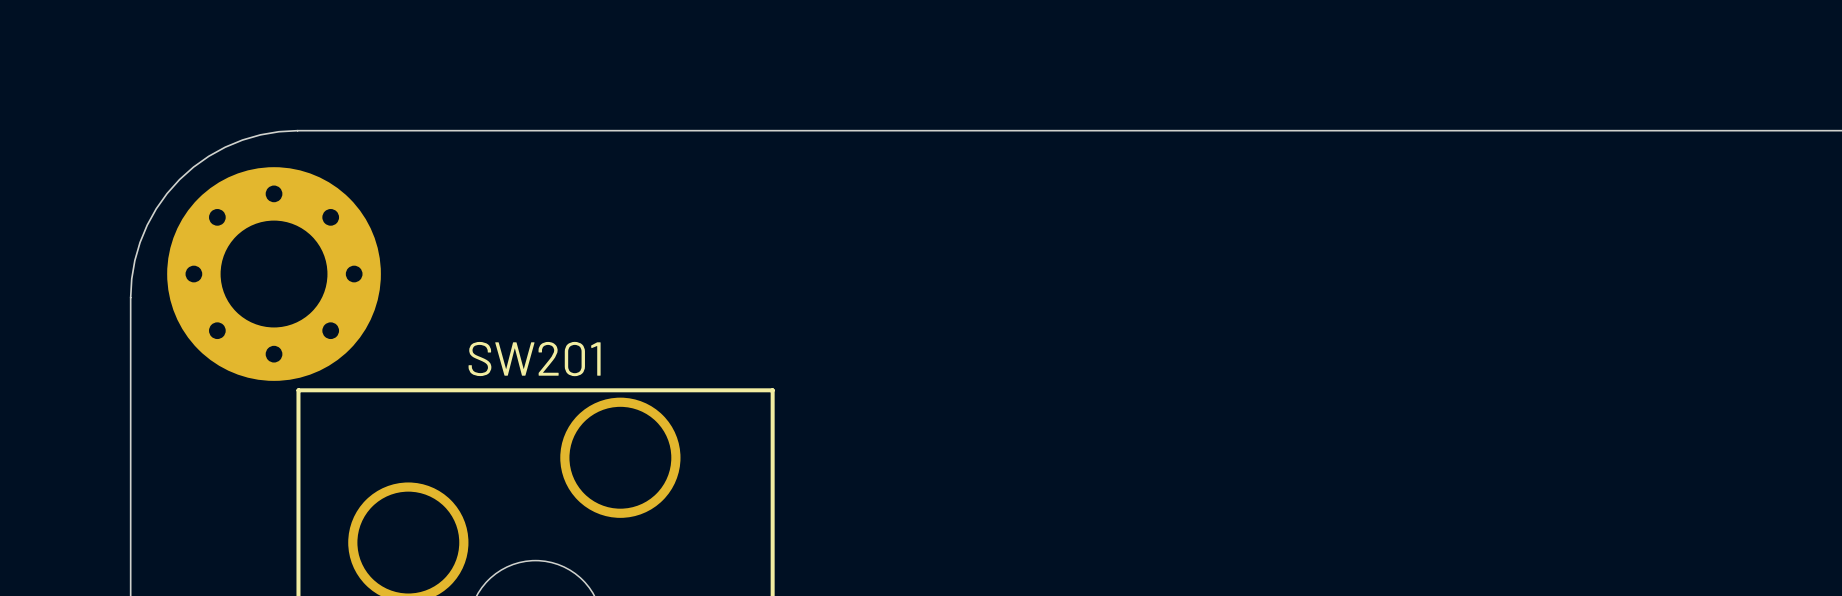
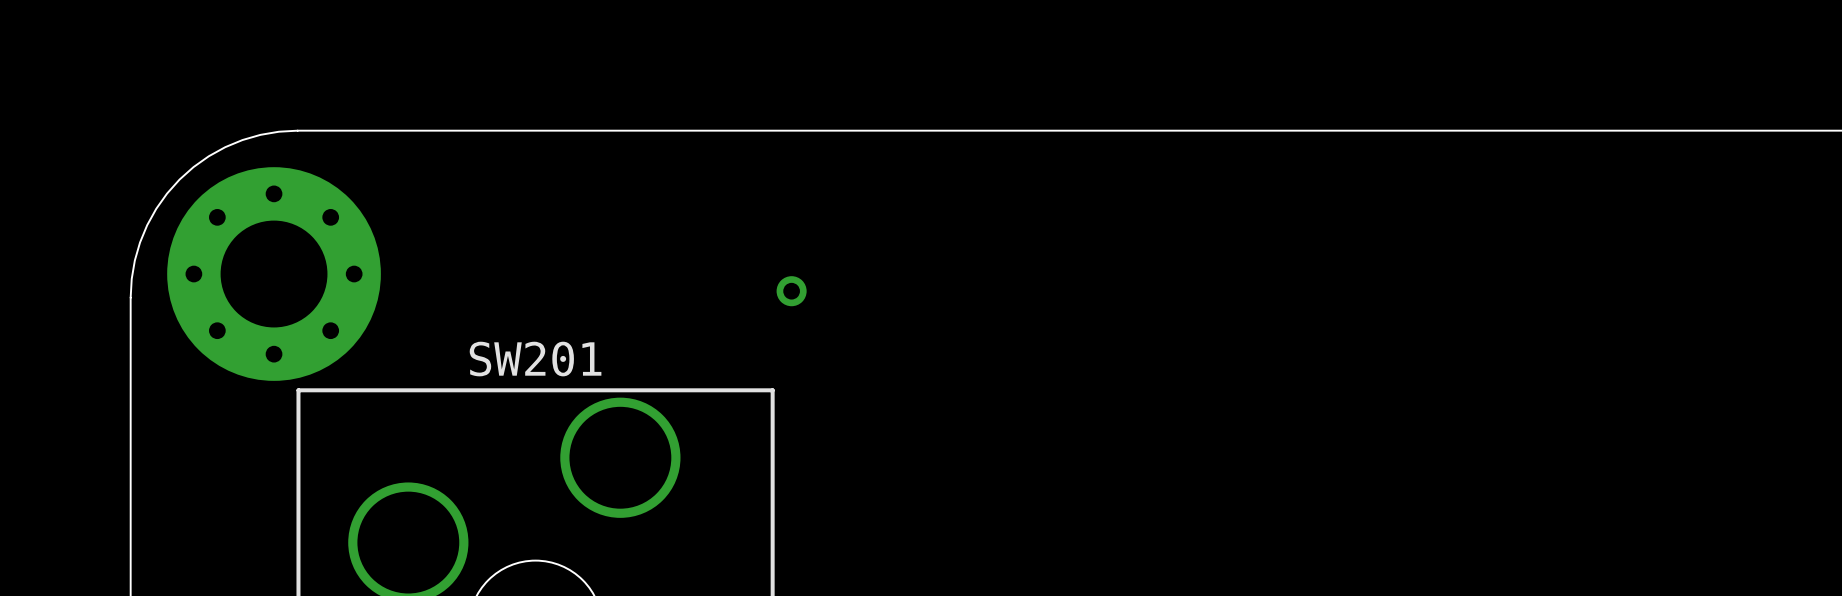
via: none -> (791, 291)

